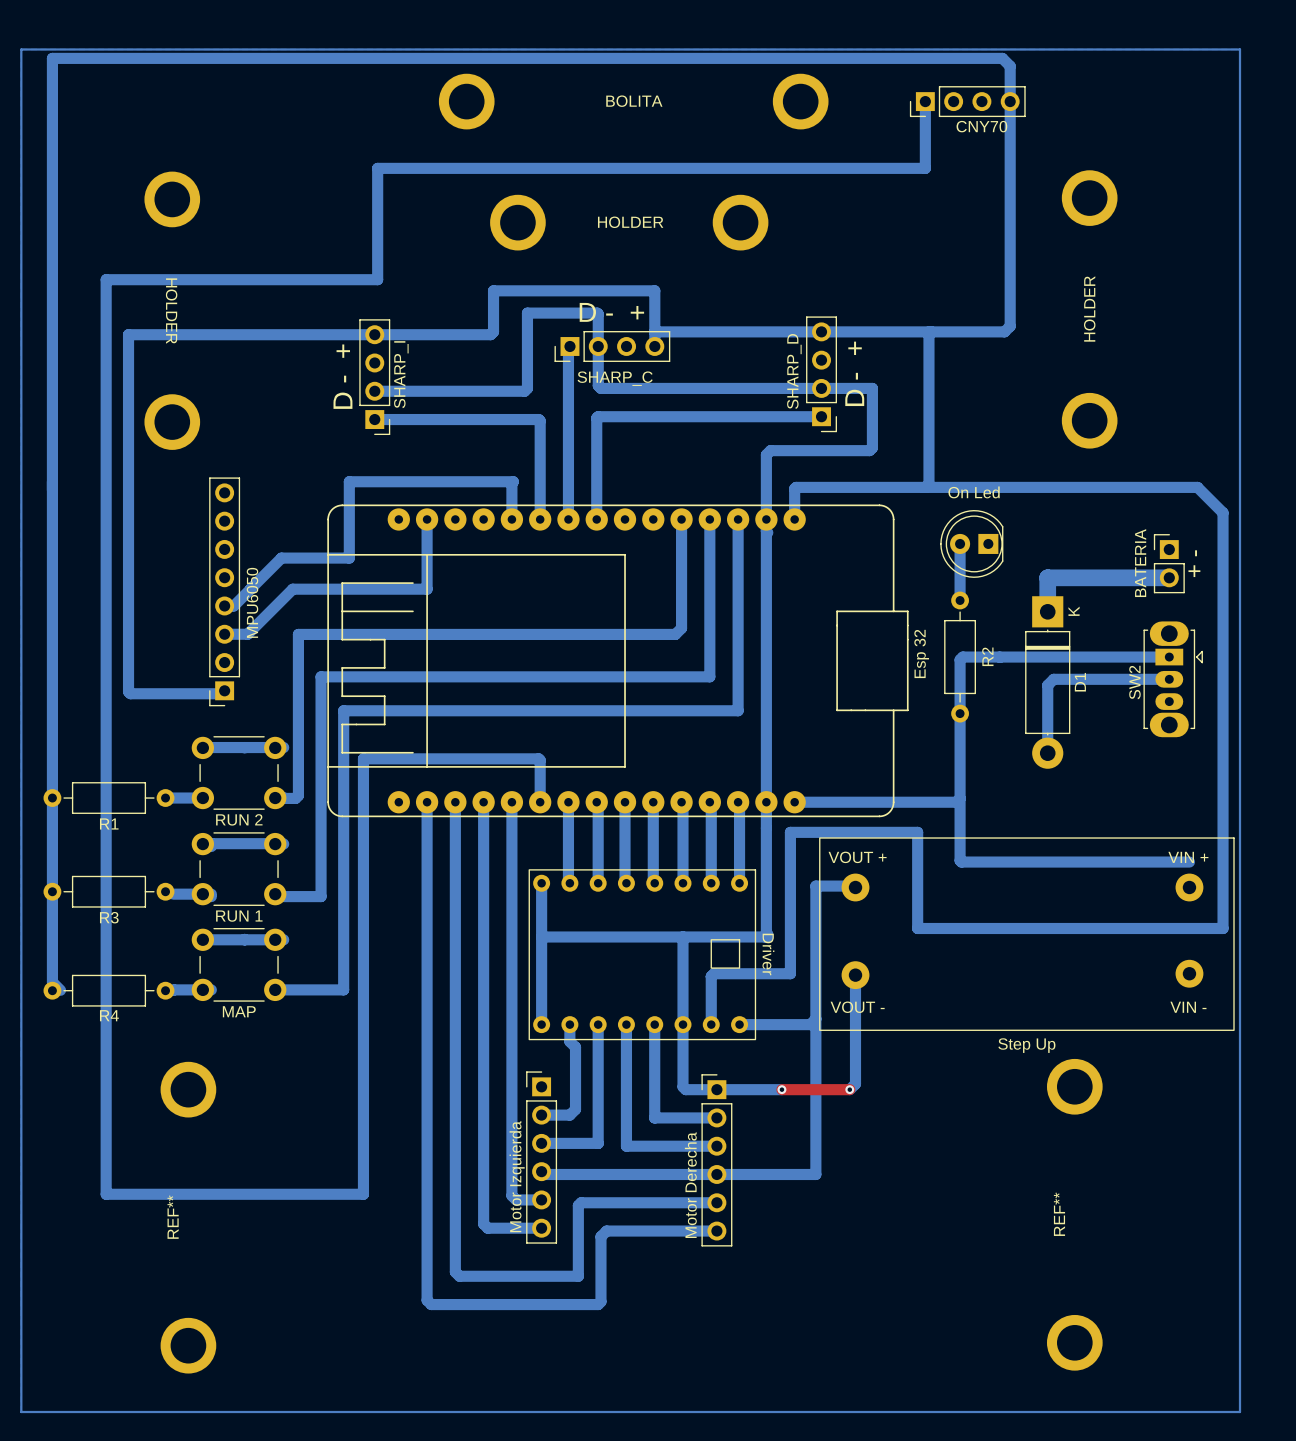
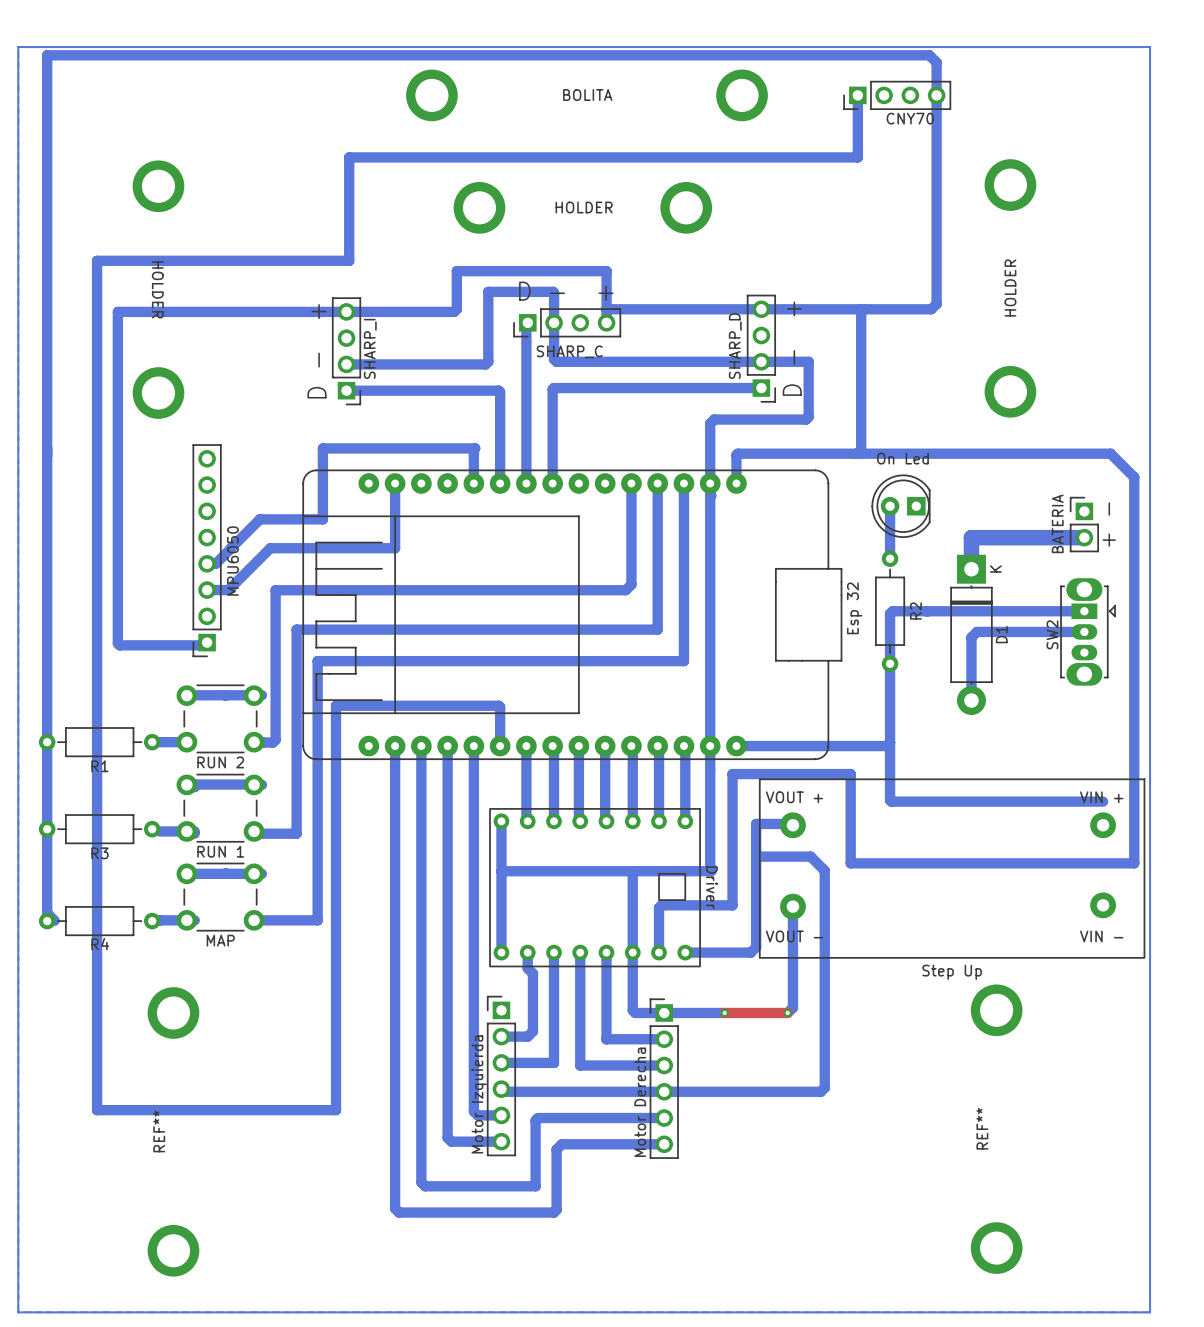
bottom track: (815, 1018) (815, 1174) -> (756, 856) (810, 856) (824, 870) (824, 1087) (820, 1091) (756, 1091)

